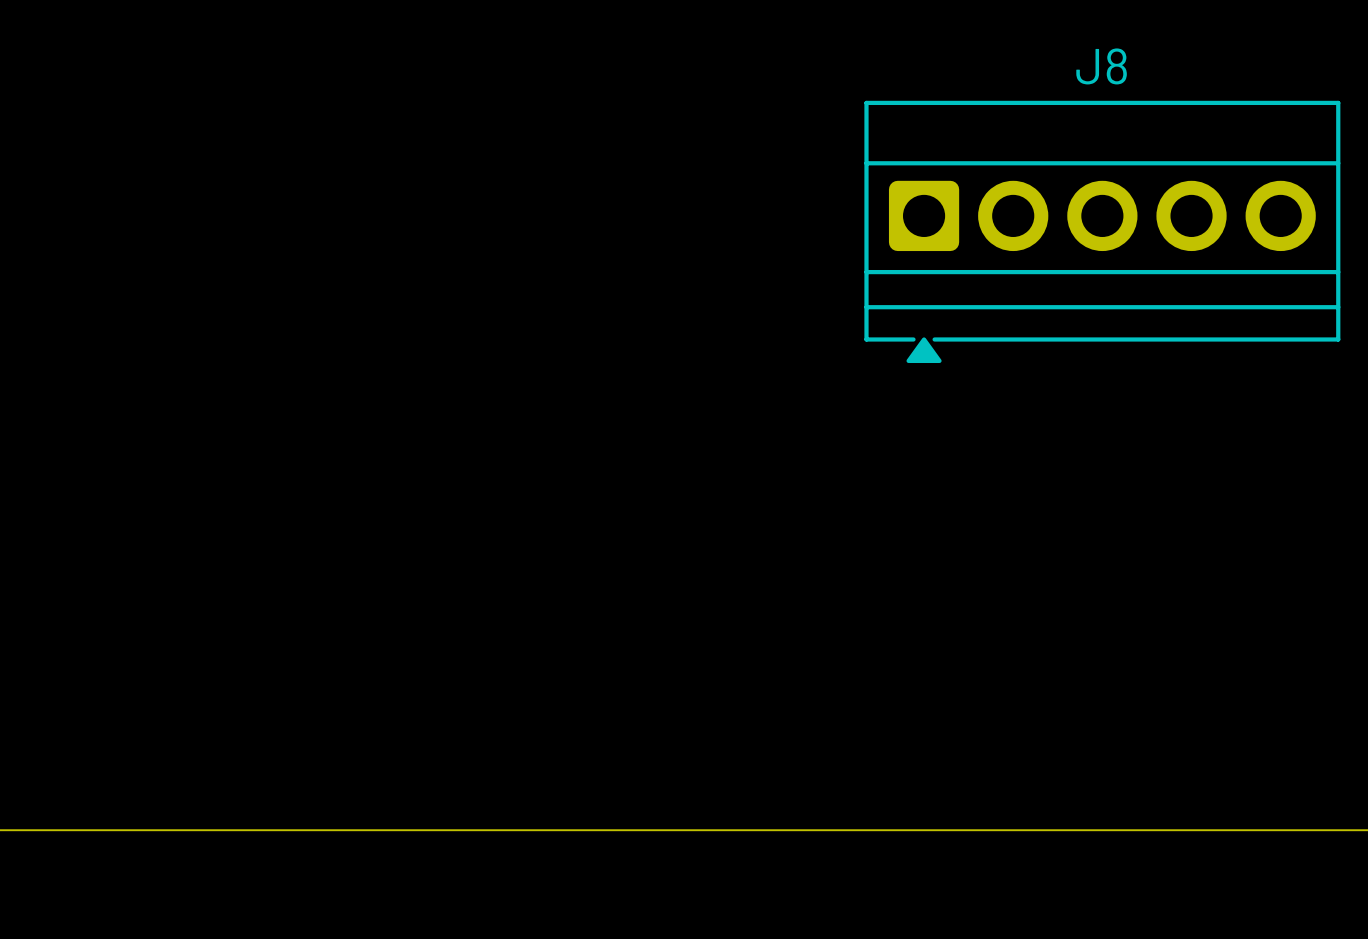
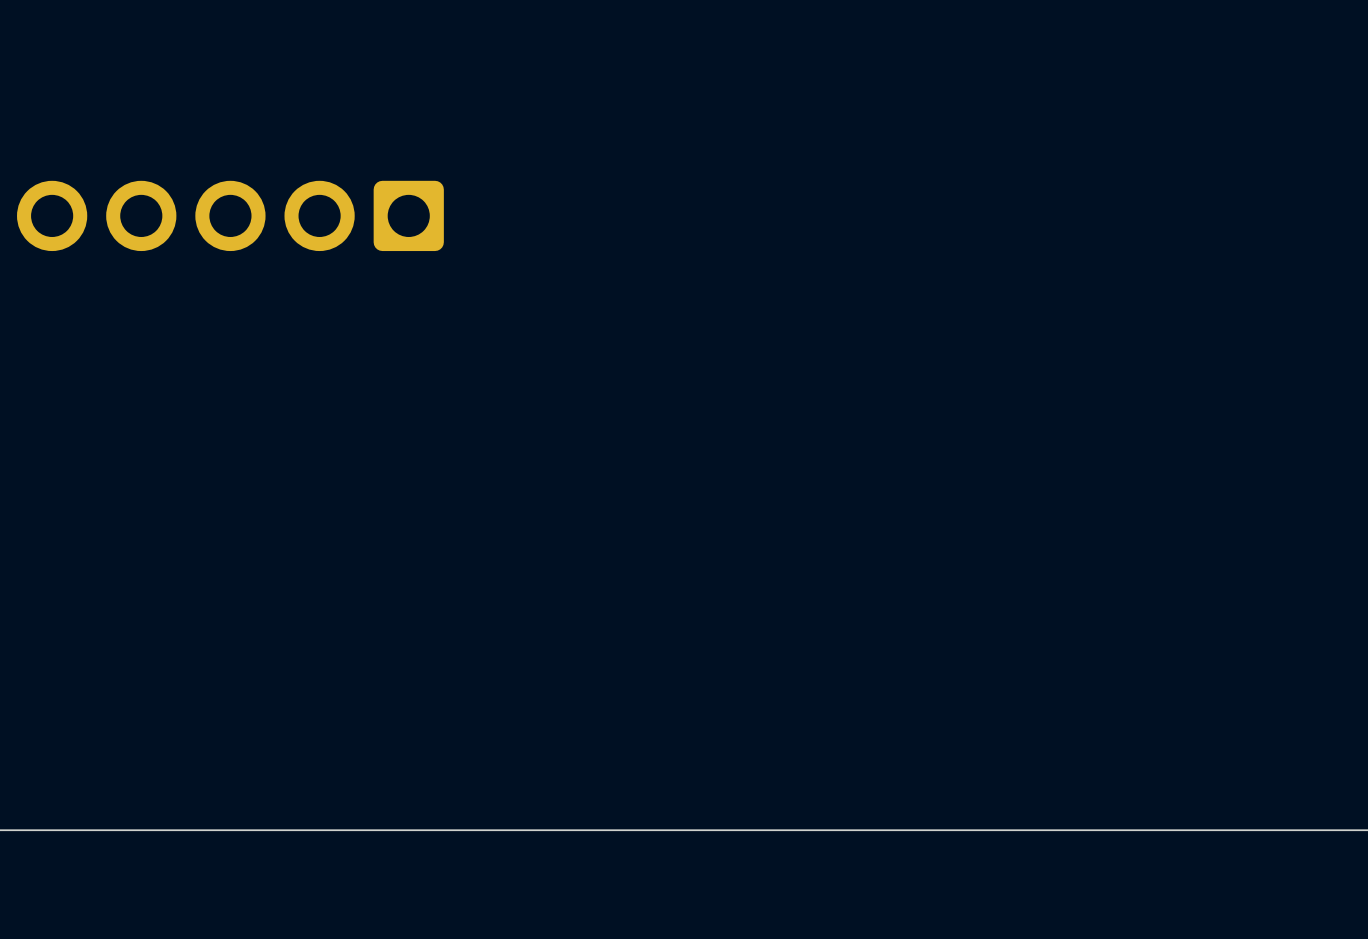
J8 side: top (1102, 231) -> bottom (230, 215)

